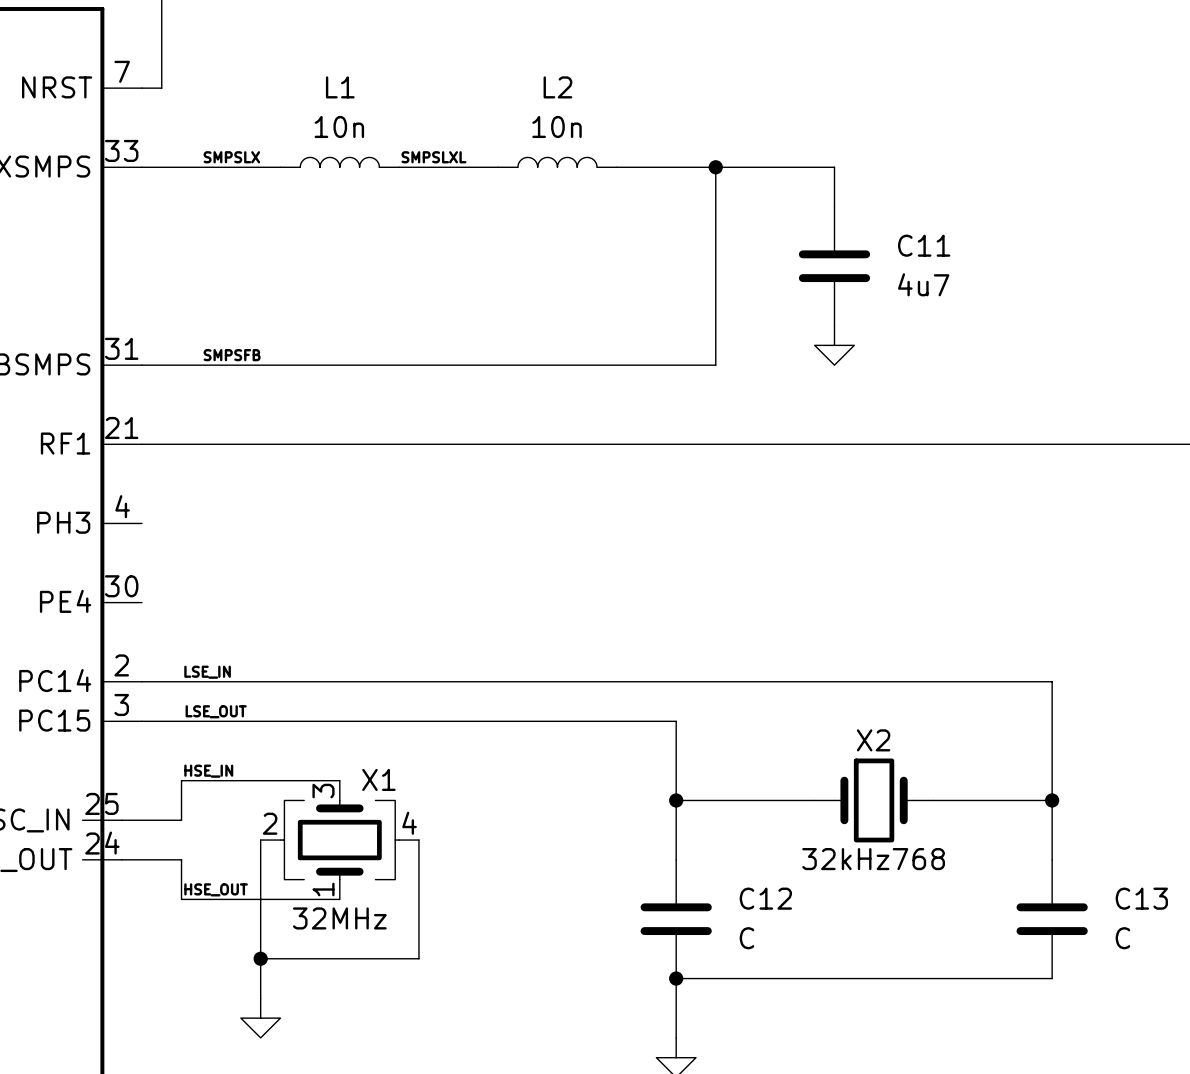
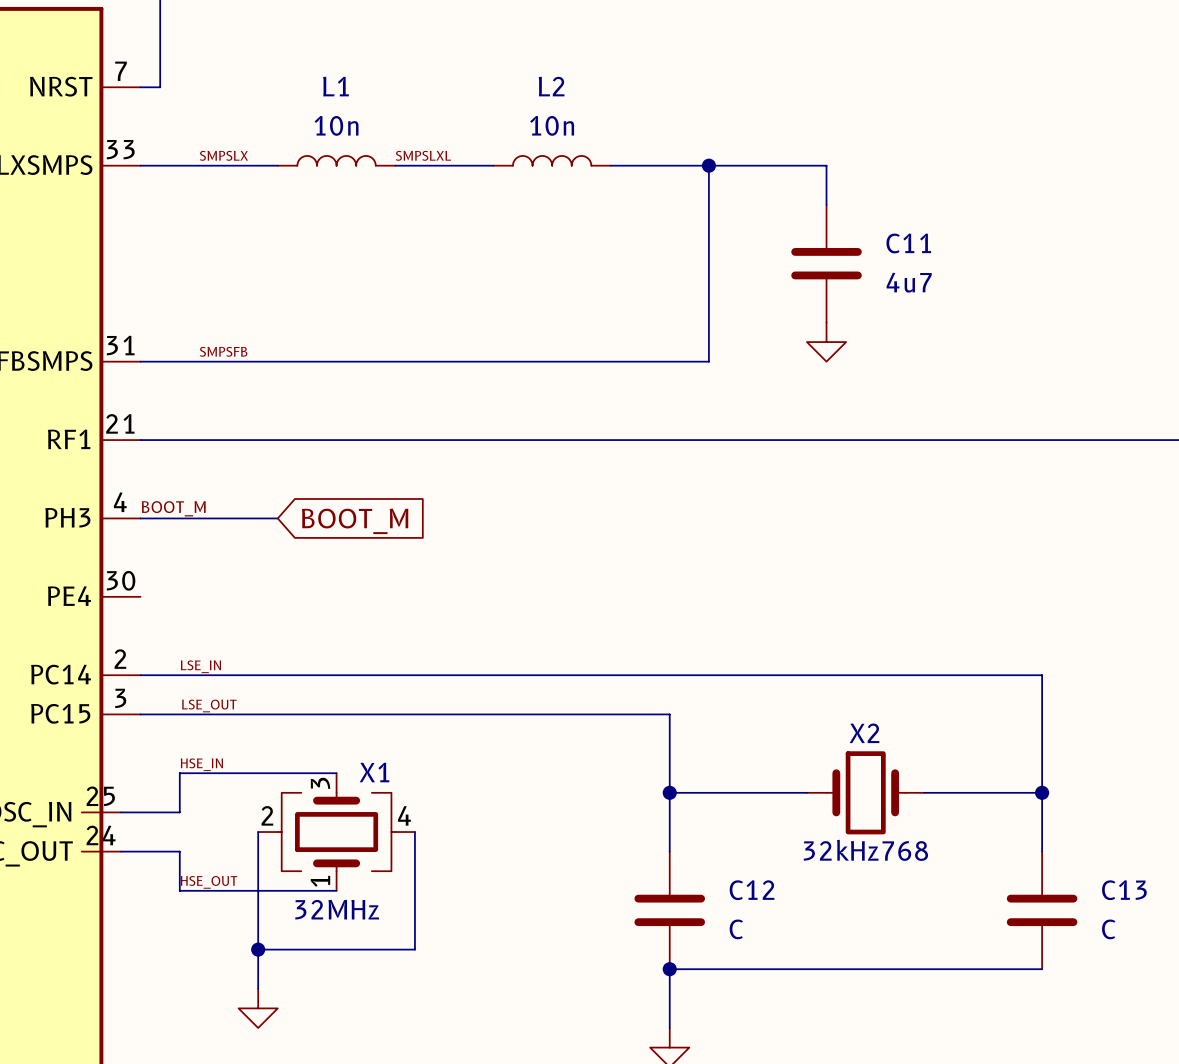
label: none -> BOOT_M (173, 508)
wire: none -> (140, 518) (277, 518)
global label: none -> BOOT_M (355, 521)

